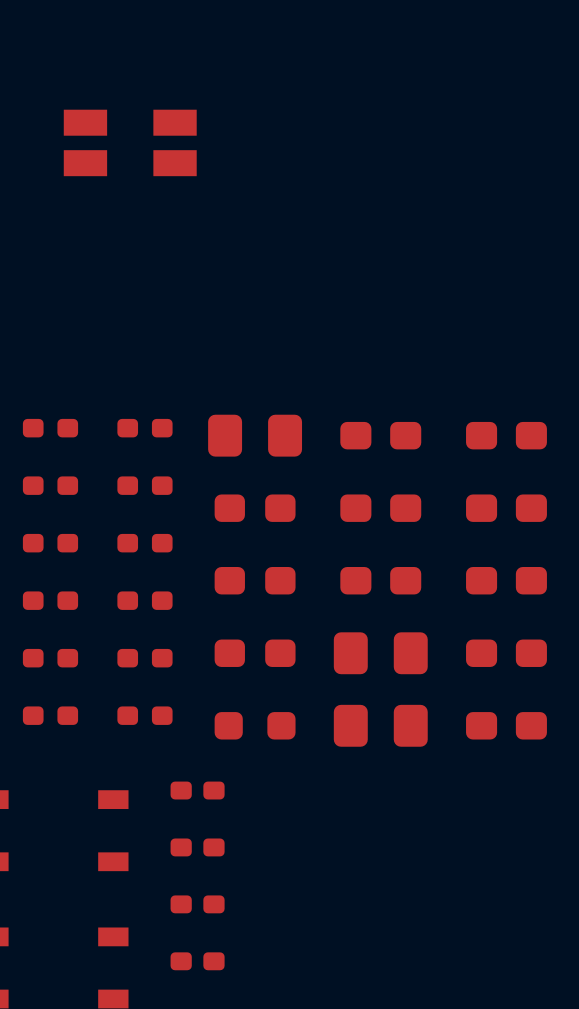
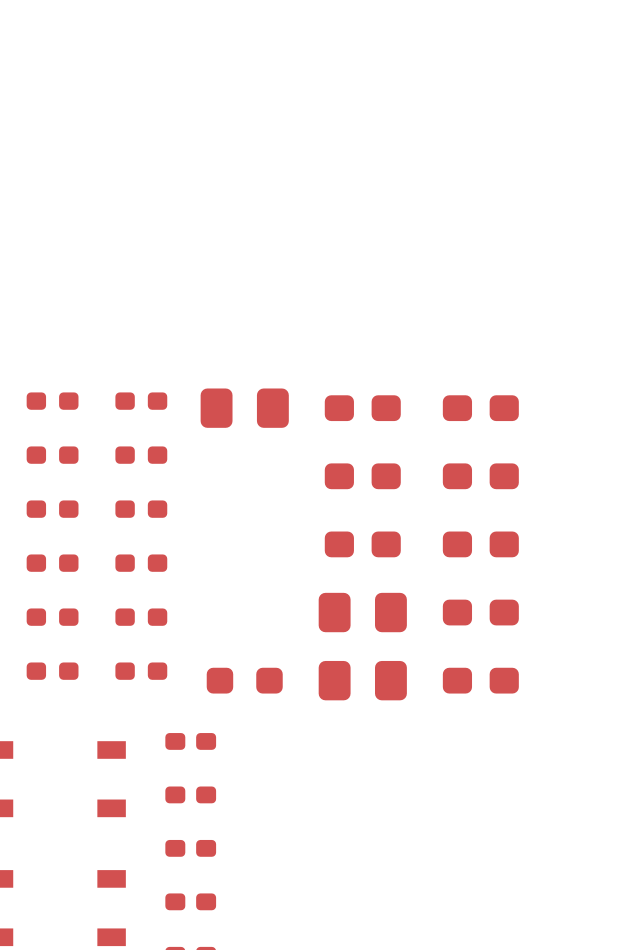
part: (130, 142) -> none
part: (255, 508) -> none
part: (255, 580) -> none
part: (255, 653) -> none

